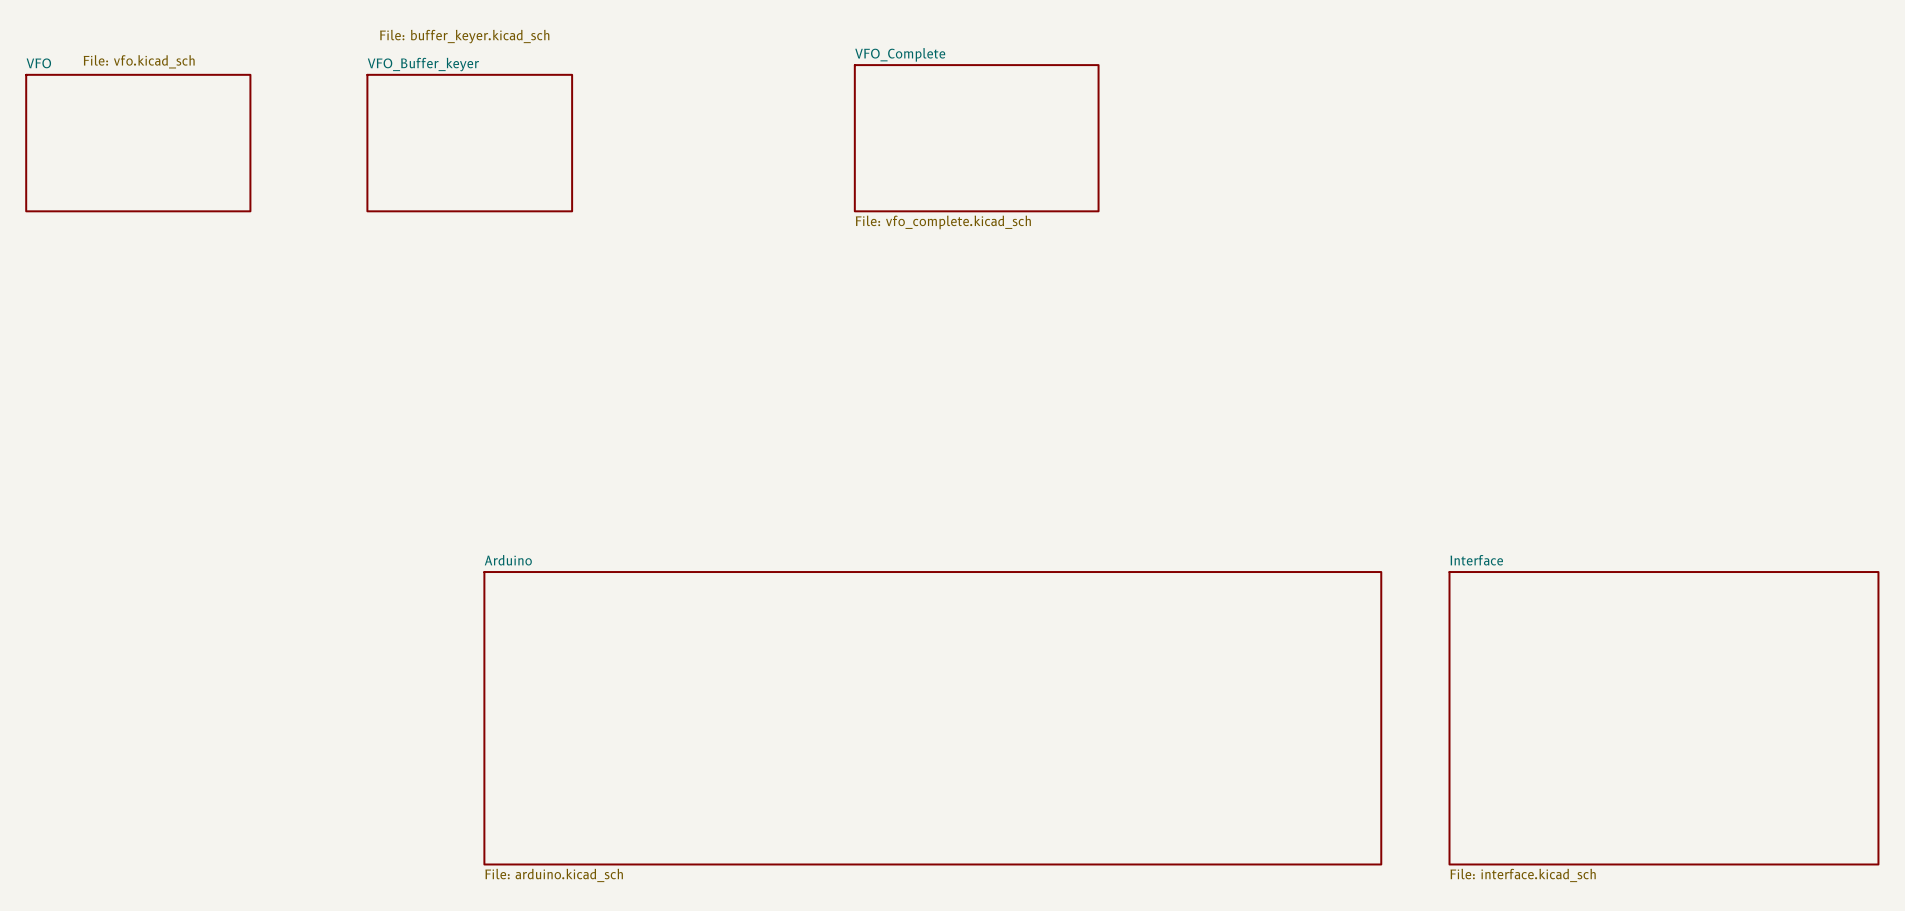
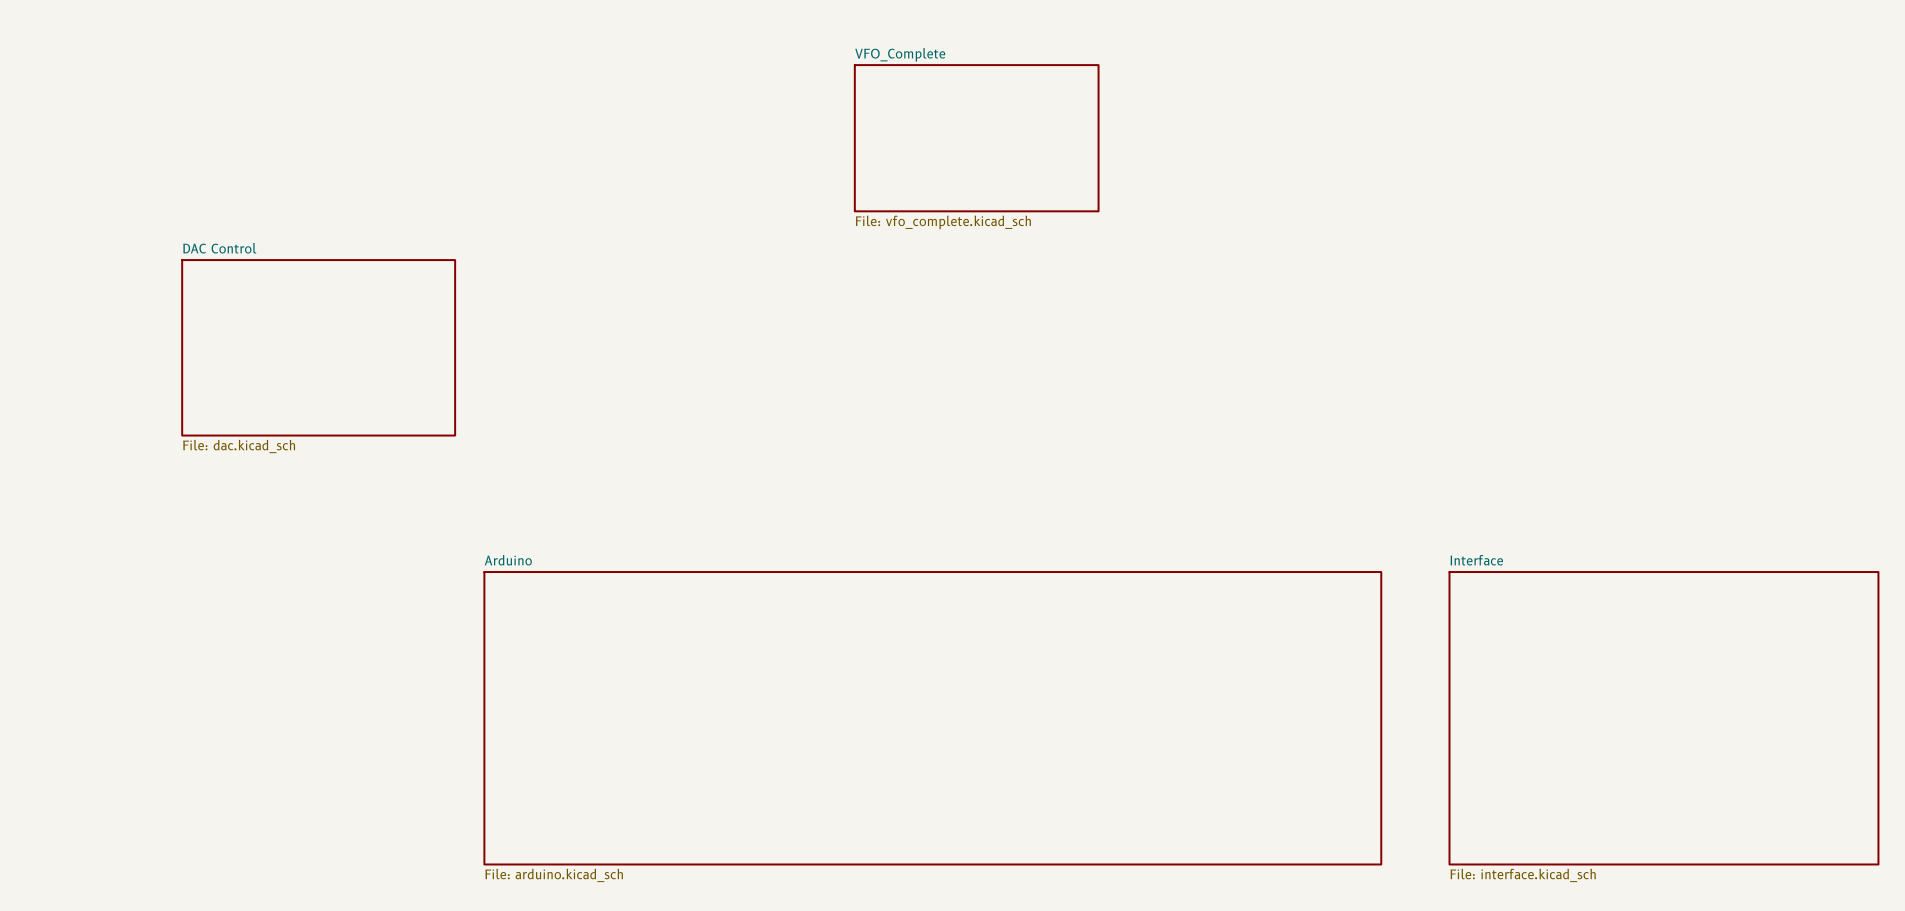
sheet VFO: File: vfo.kicad_sch (138, 143) -> none
sheet VFO_Buffer_keyer: File: buffer_keyer.kicad_sch (469, 143) -> none
sheet DAC Control: none -> File: dac.kicad_sch (318, 347)

